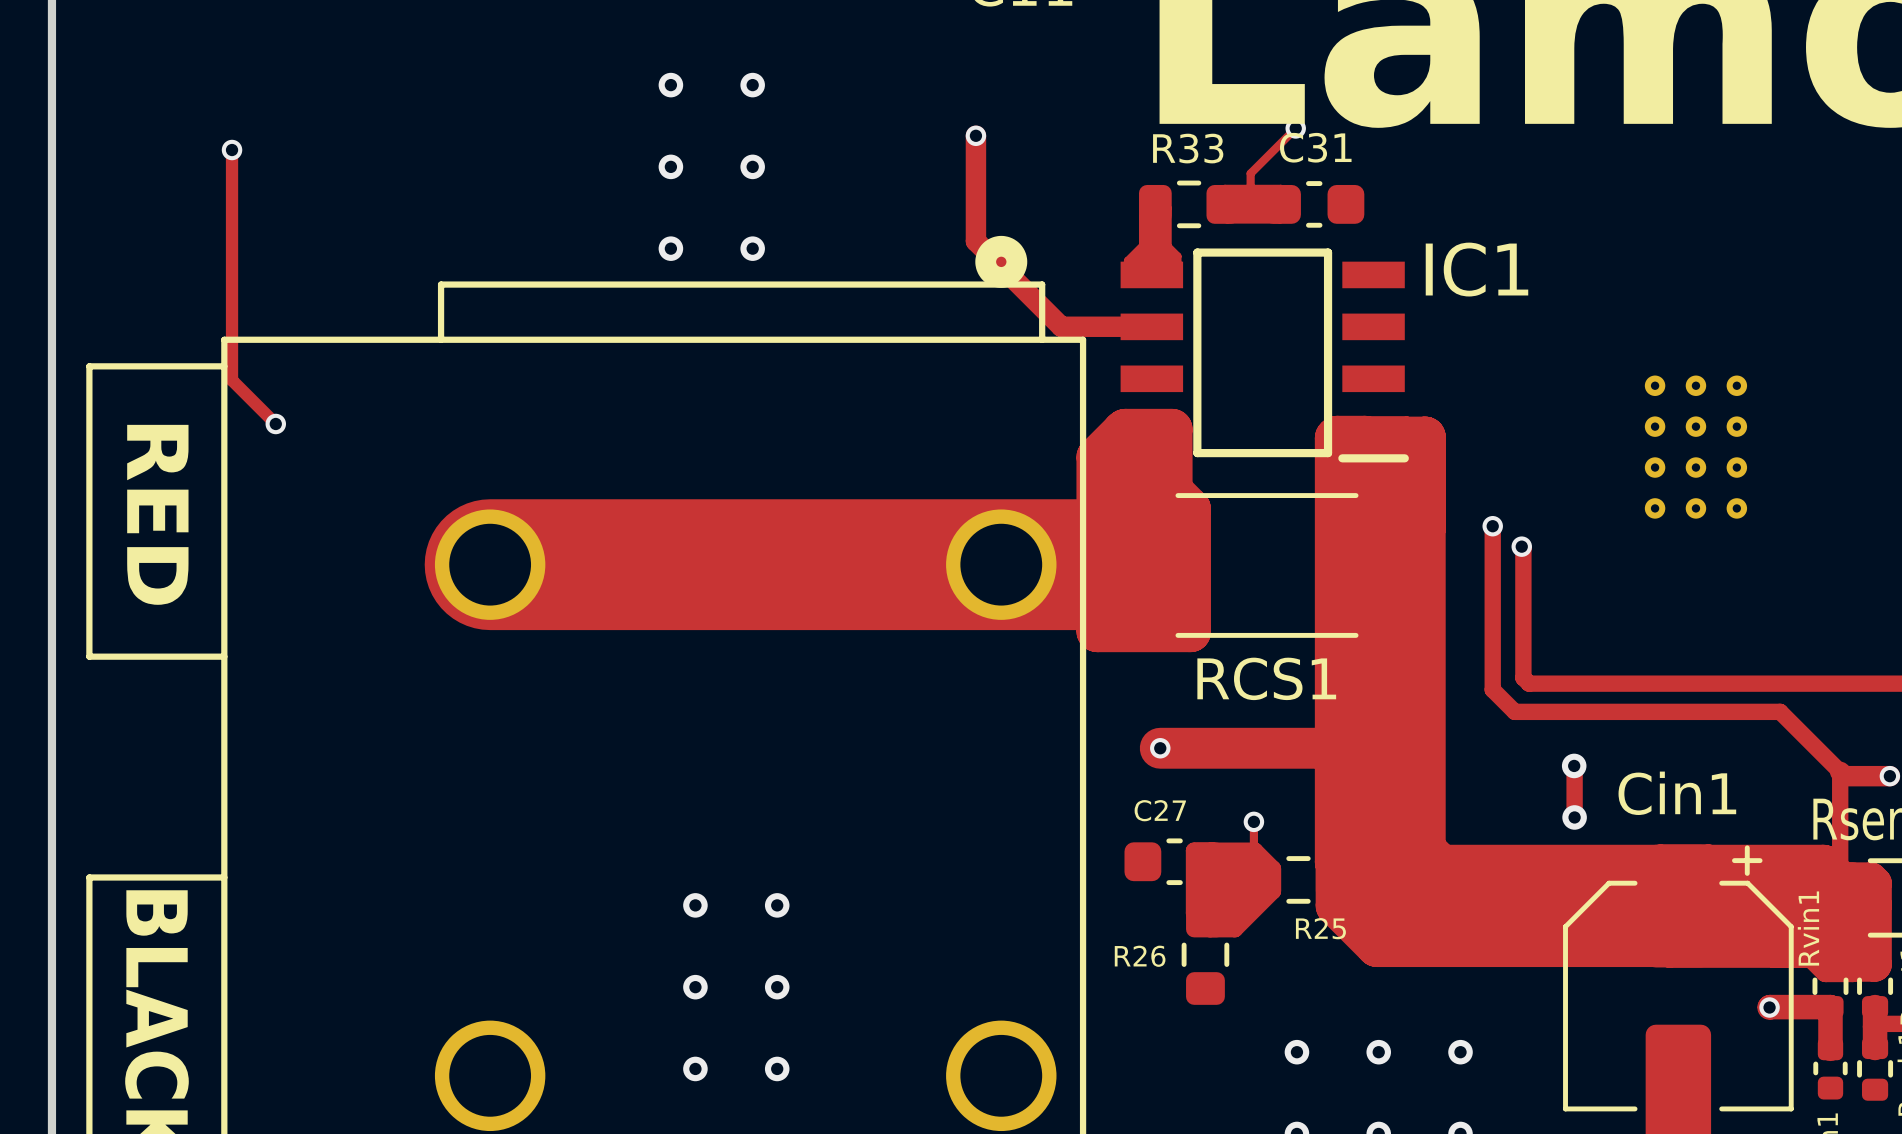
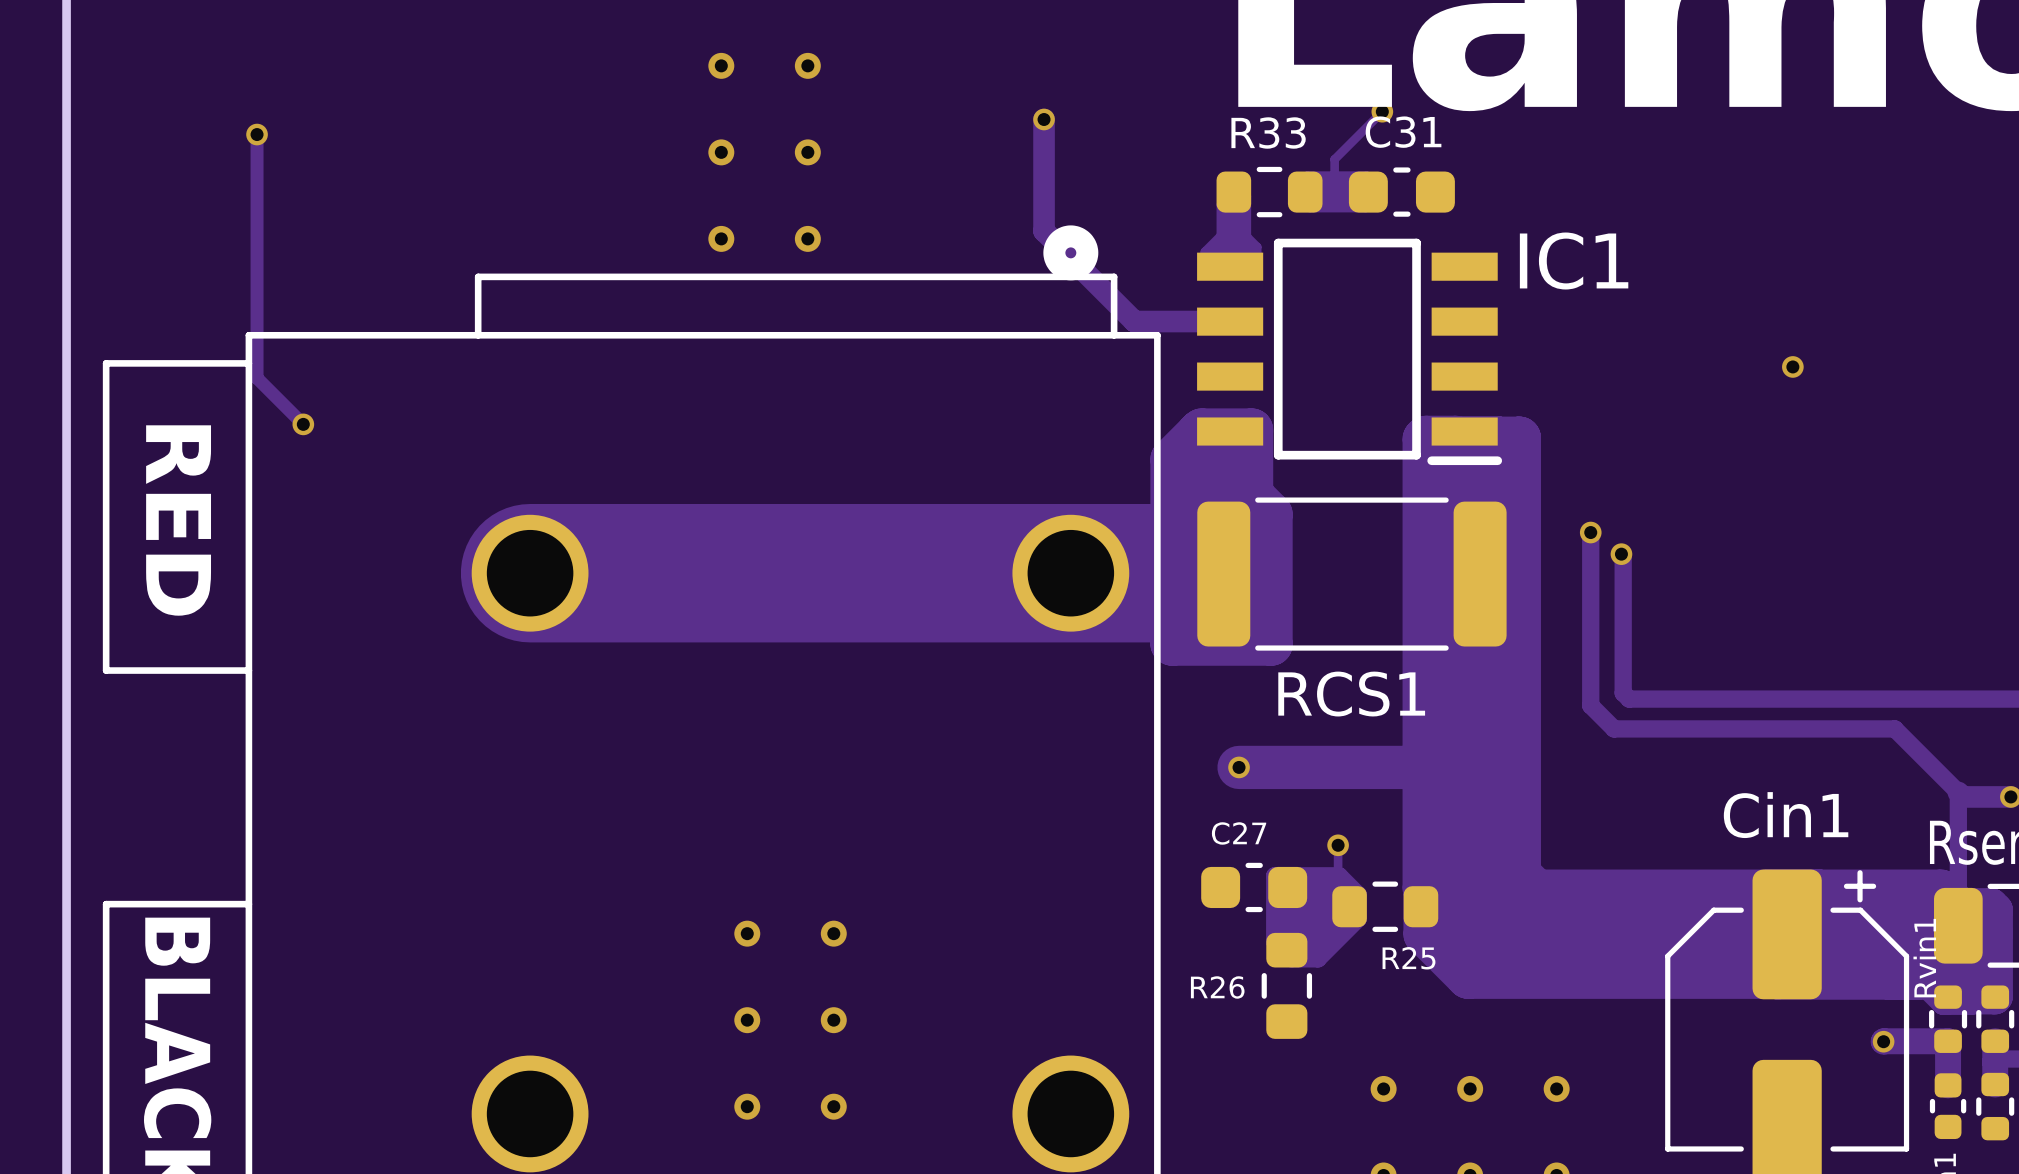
via: none -> (1792, 366)
part: (1695, 447) -> none
via: (1574, 765) -> none
track: (1574, 766) (1574, 817) -> none
via: (1574, 817) -> none

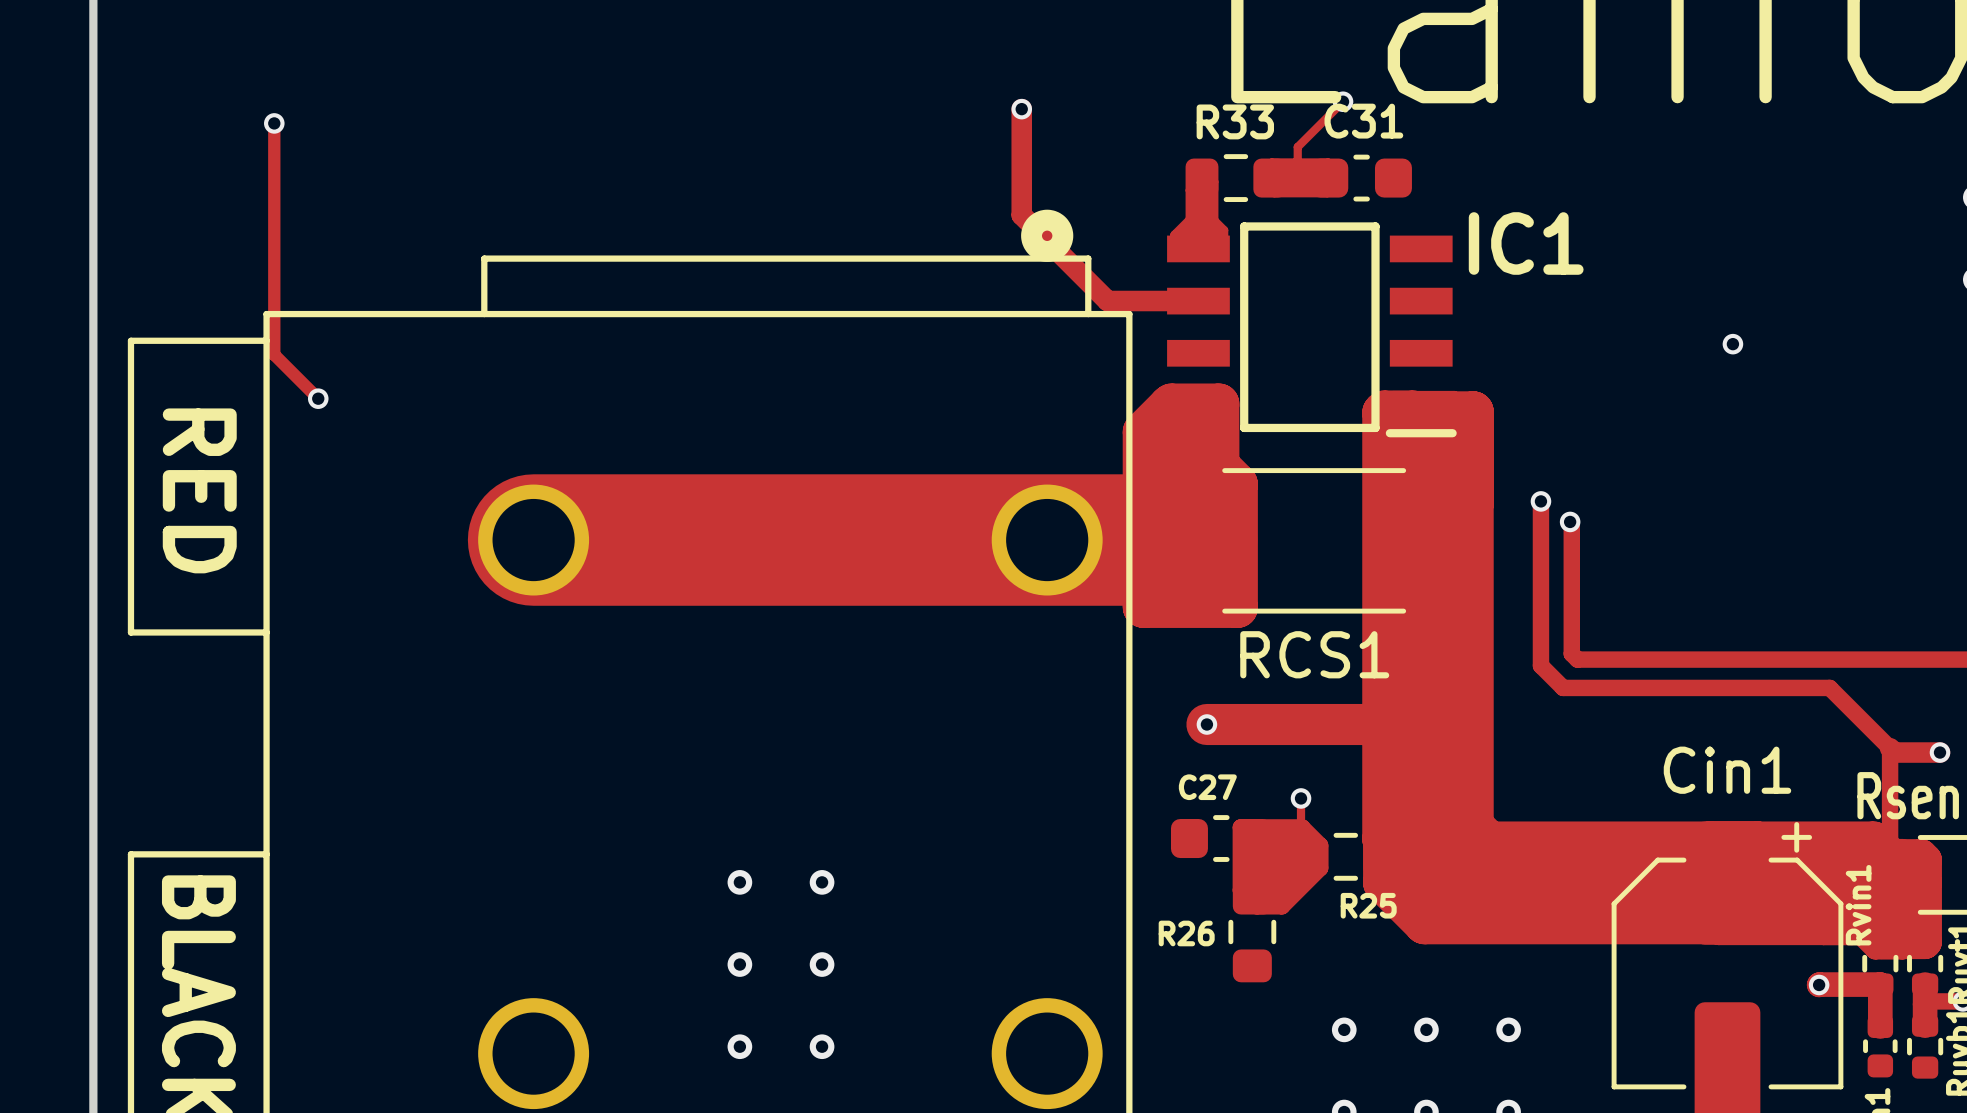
via: (721, 65) -> none
via: (807, 65) -> none
via: (721, 152) -> none
via: (807, 152) -> none
via: (721, 238) -> none
via: (807, 238) -> none

